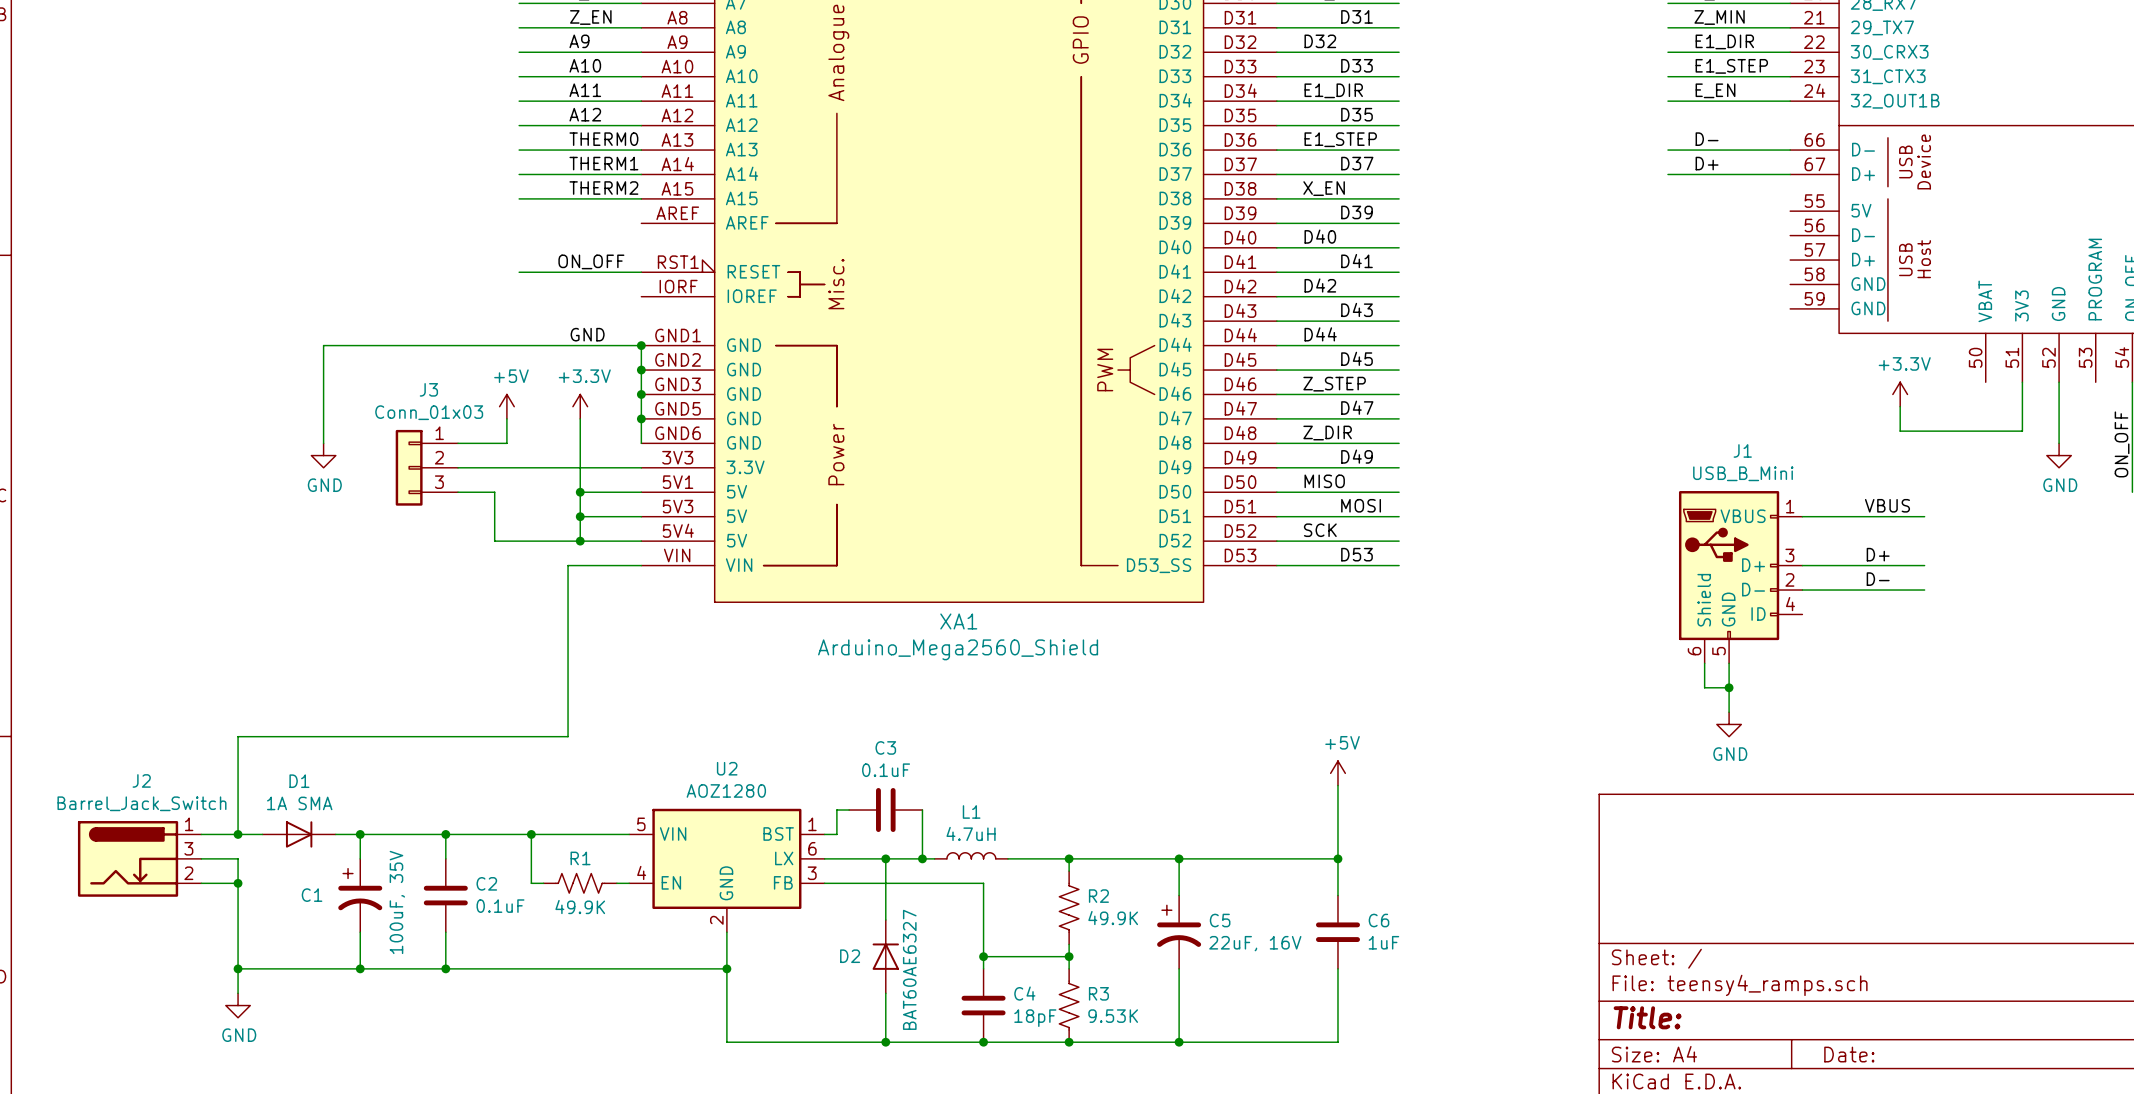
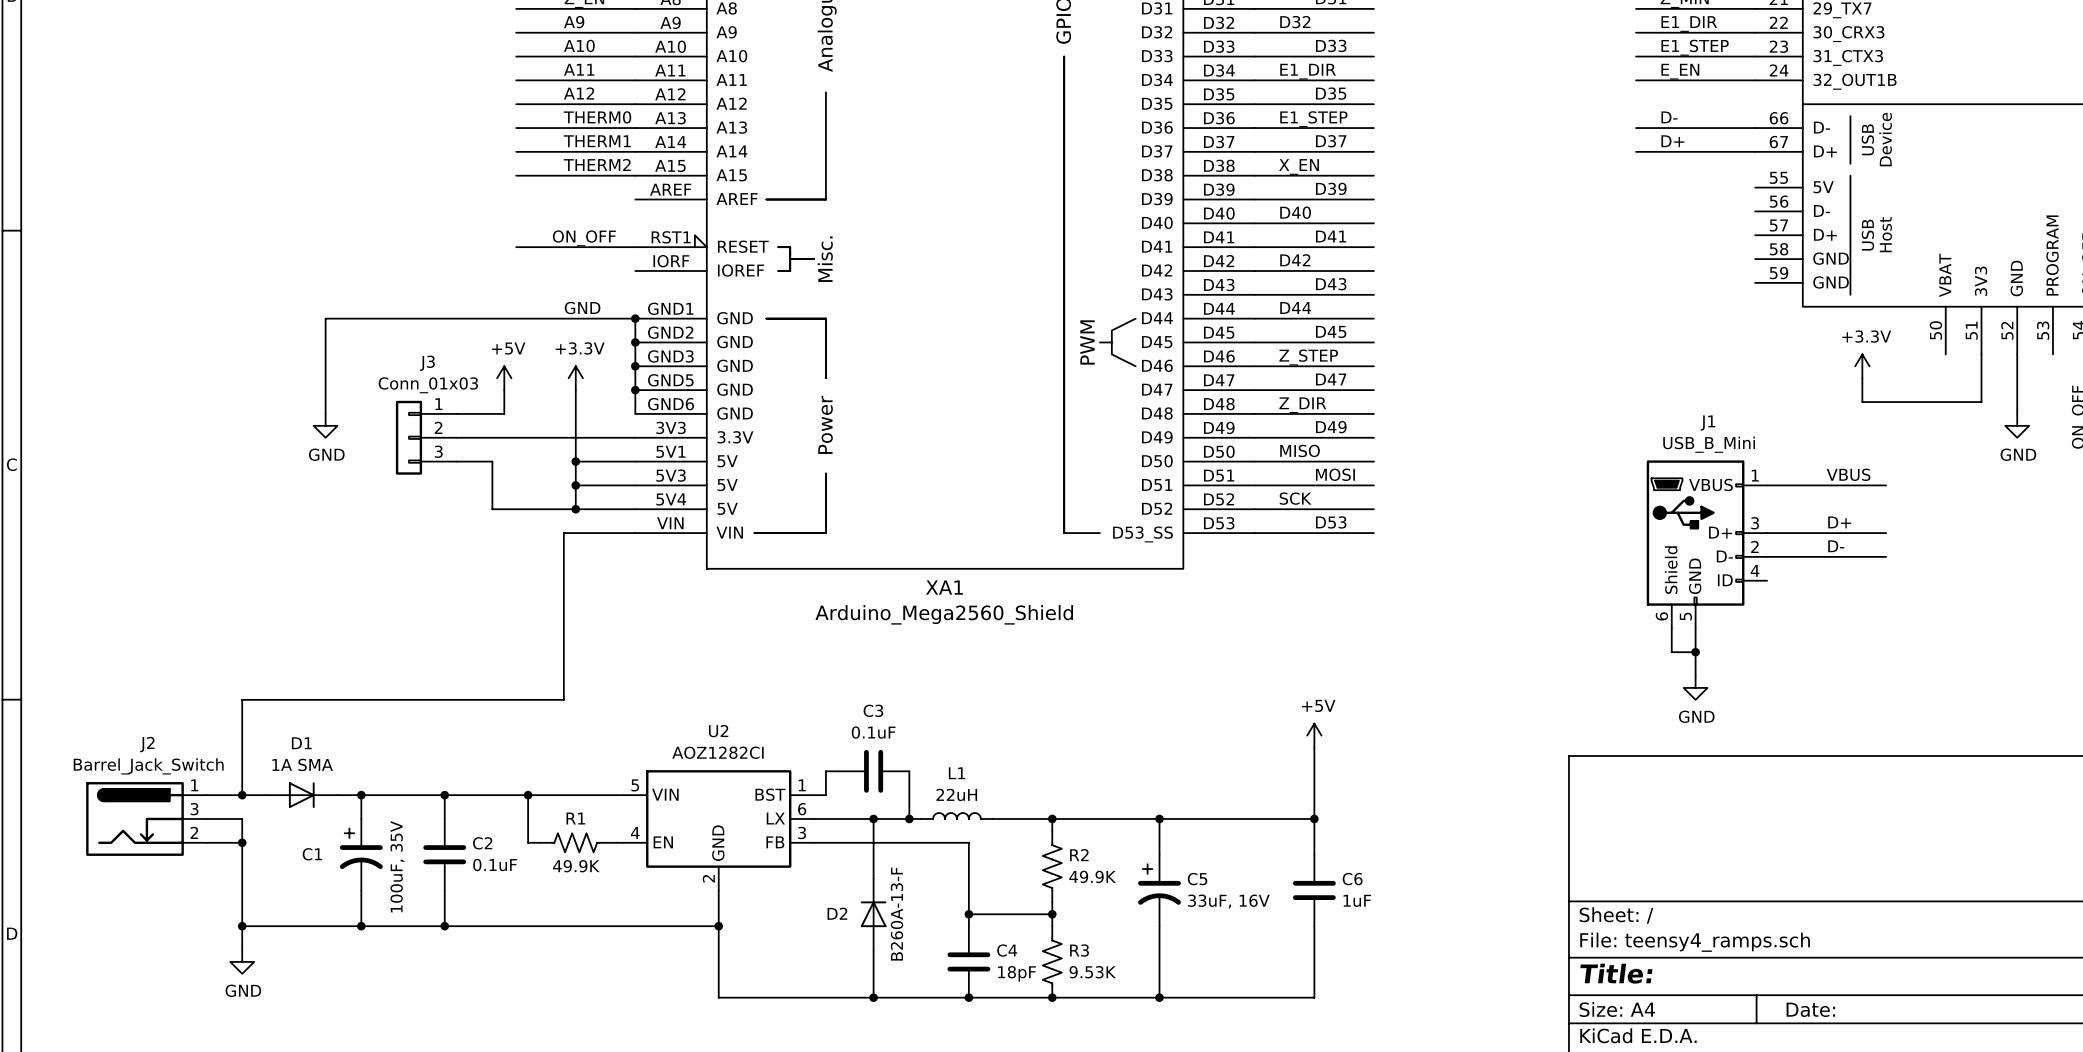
U2 value: AOZ1280 (726, 790) -> AOZ1282CI (717, 752)
L1 value: 4.7uH (971, 833) -> 22uH (956, 794)
C5 value: 22uF, 16V (1255, 943) -> 33uF, 16V (1228, 901)
D2 value: BAT60AE6327 (909, 969) -> B260A-13-F (896, 914)

